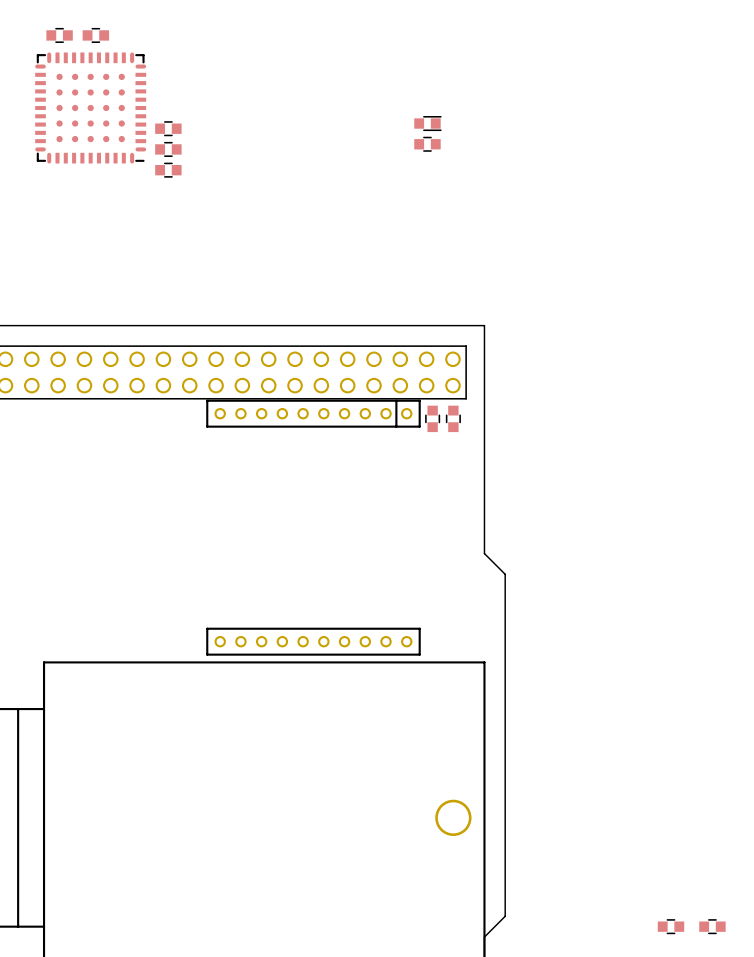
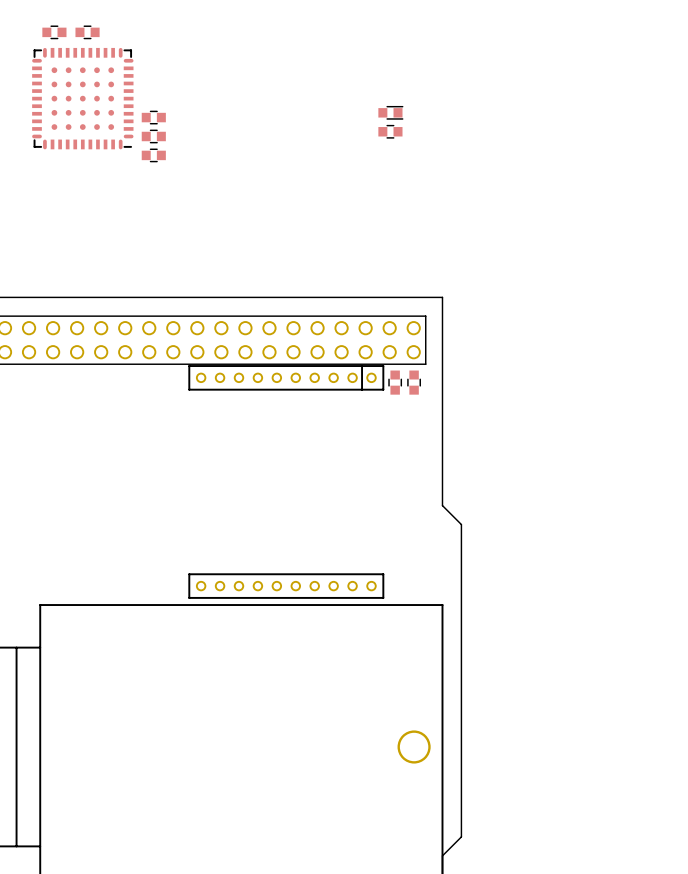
part: (671, 926) -> none
part: (712, 926) -> none

